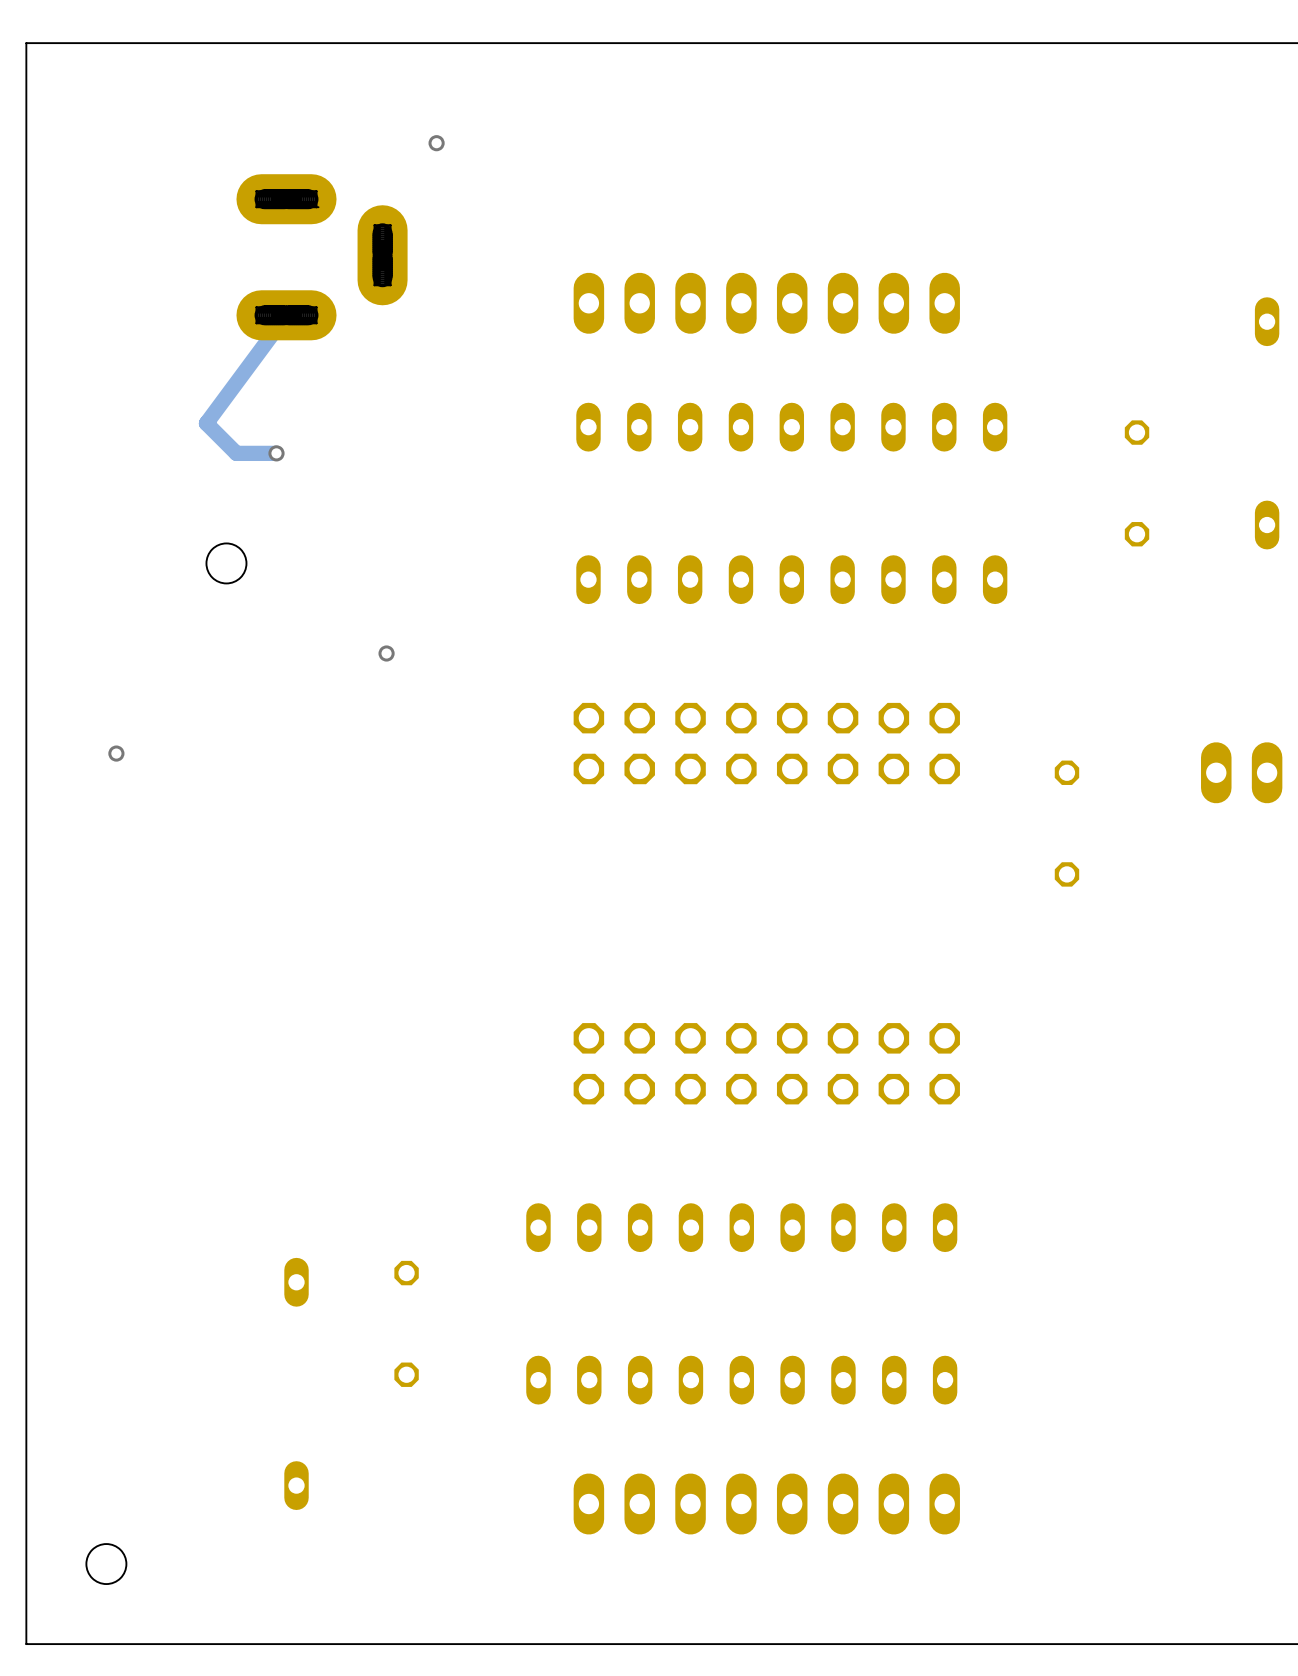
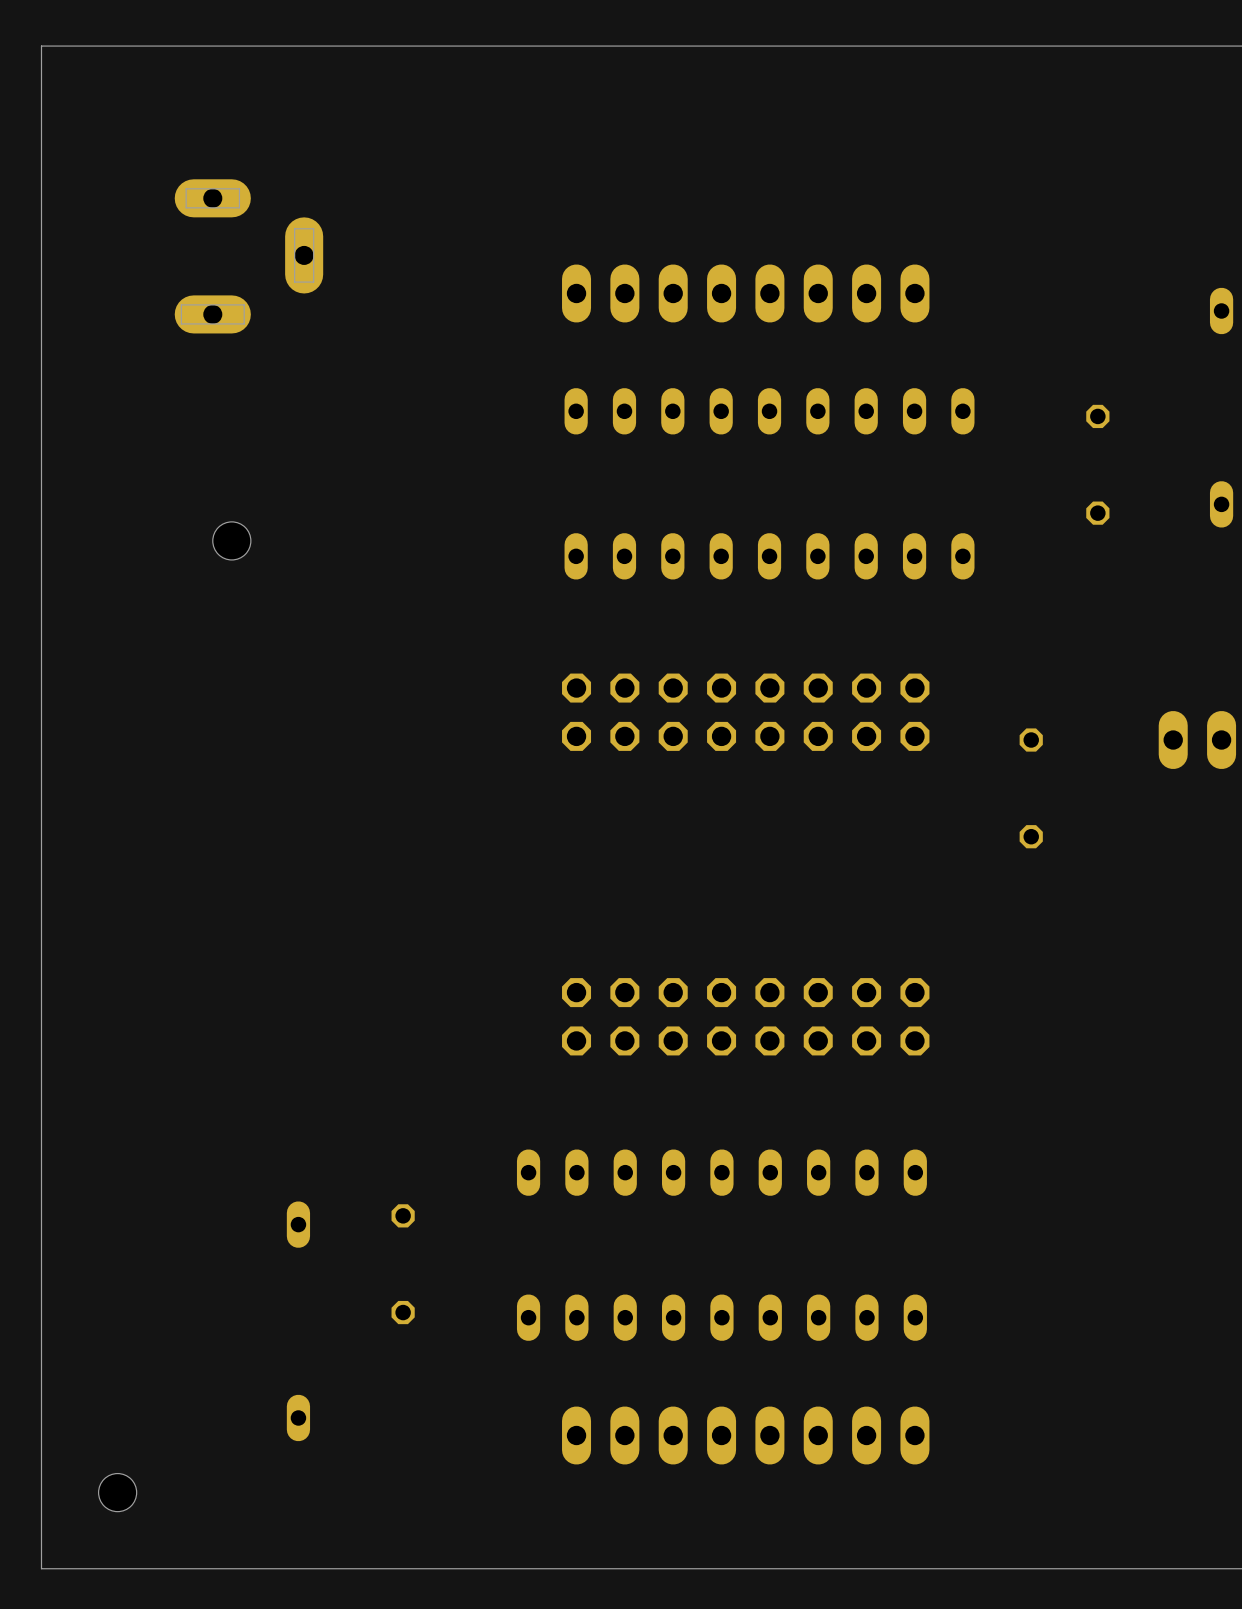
via: (436, 143) -> none
part: (322, 257) -> none
part: none -> (248, 256)
track: (286, 315) (206, 423) (236, 453) (276, 453) -> none
via: (276, 453) -> none
via: (386, 653) -> none
via: (116, 753) -> none

